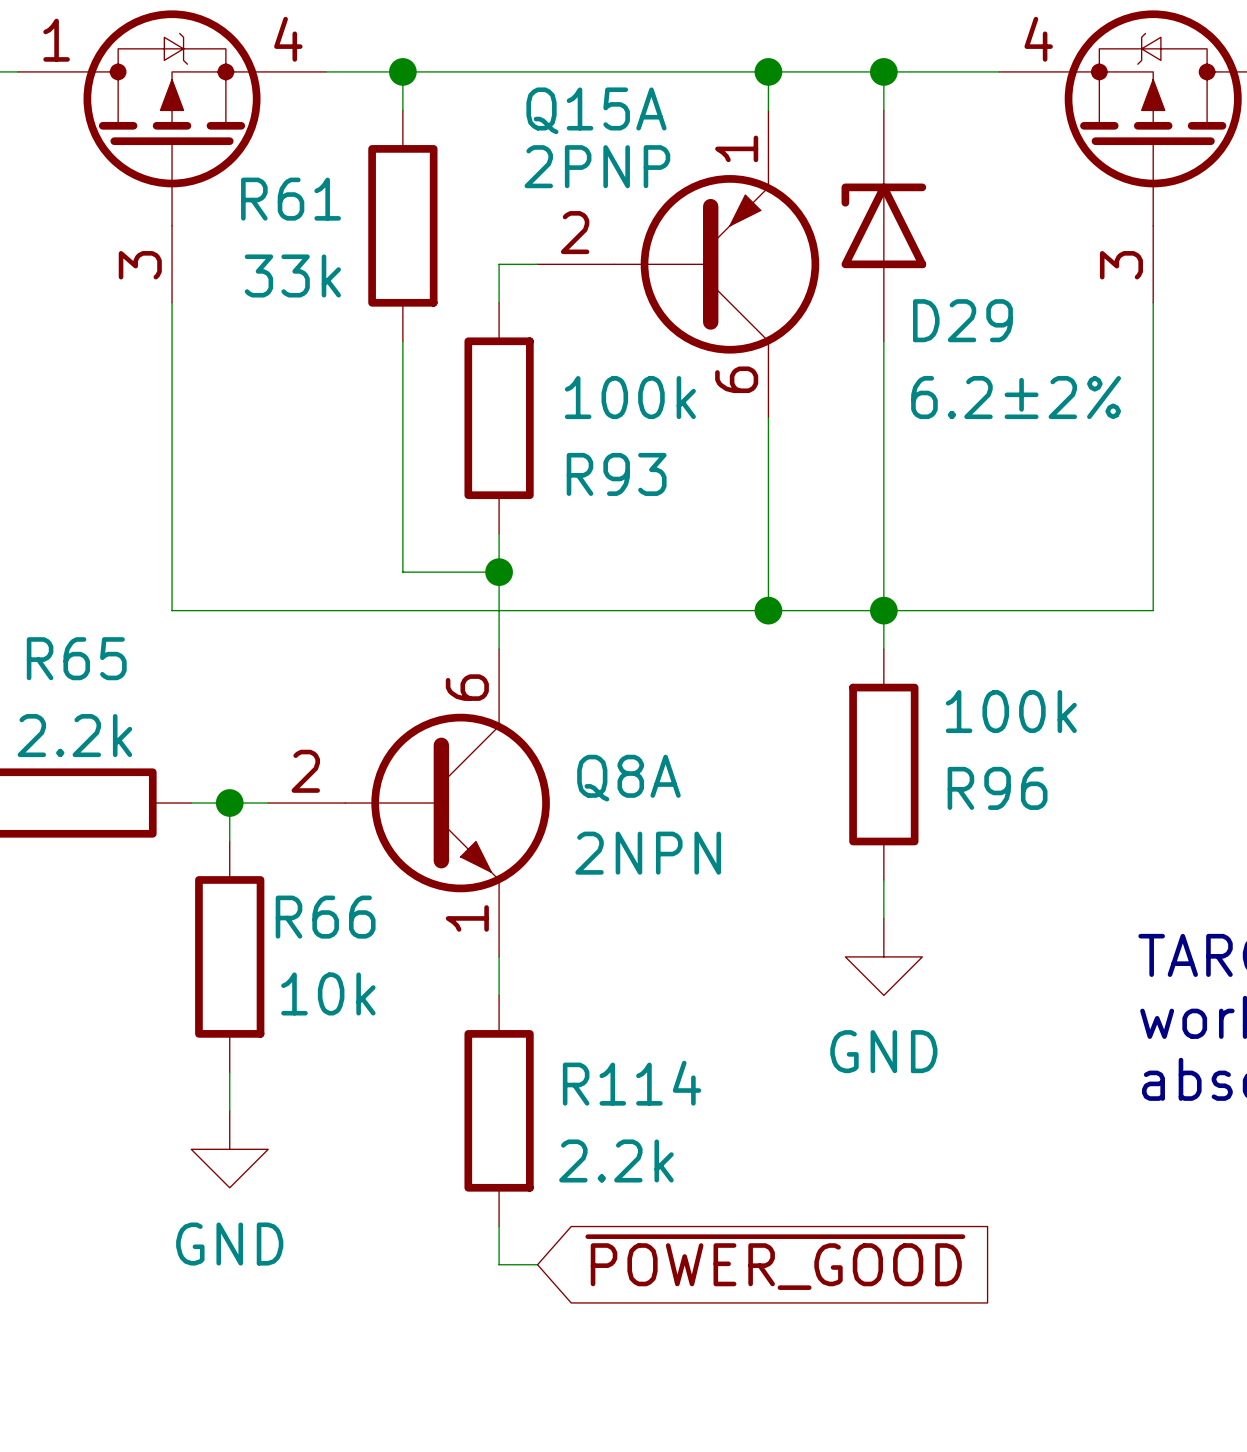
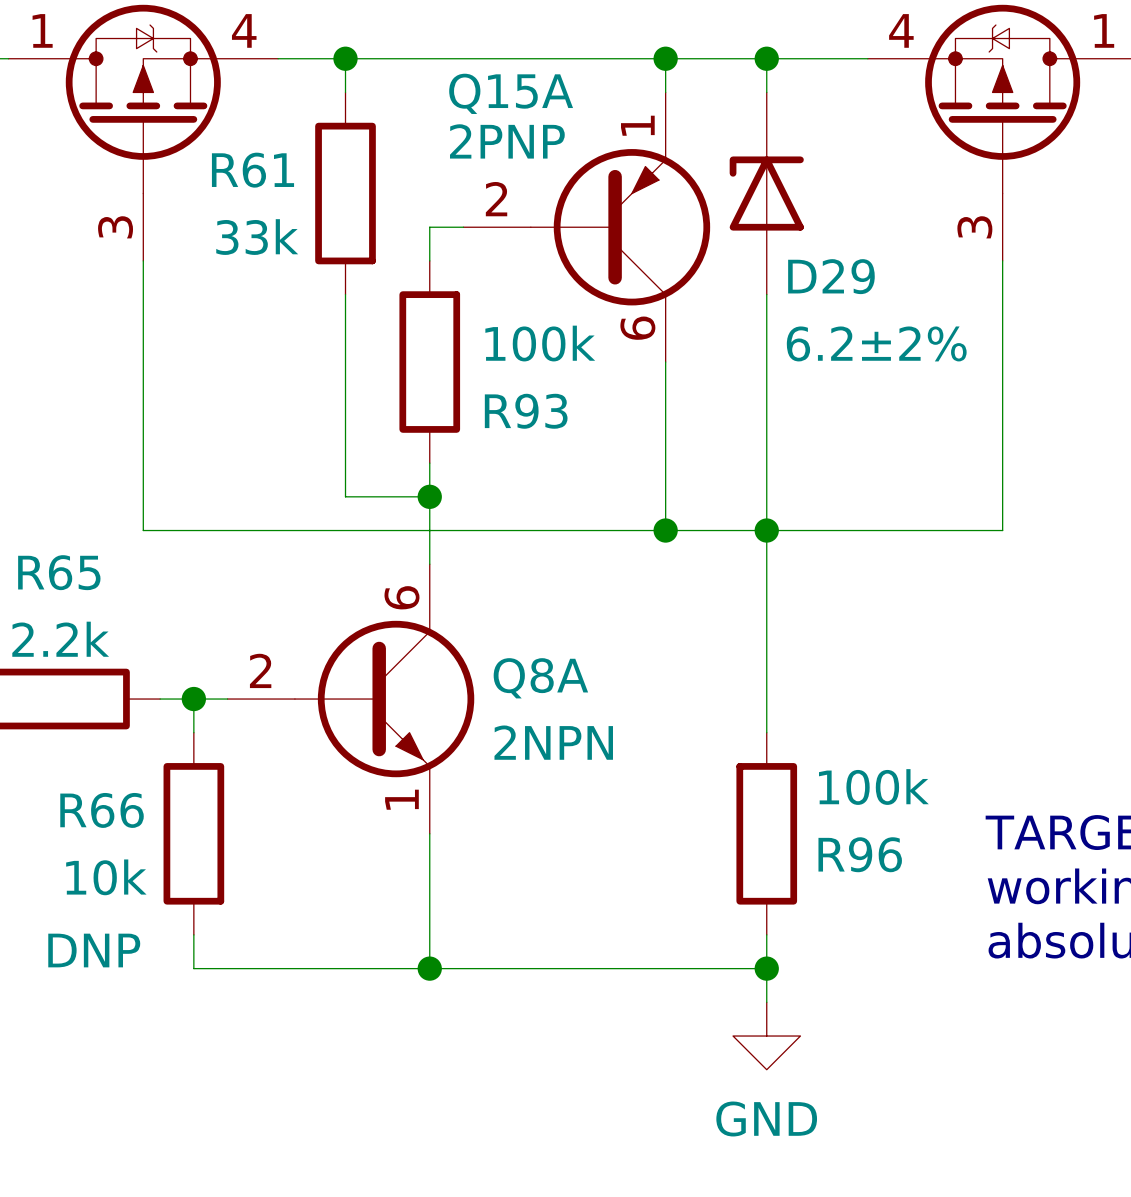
wire: none -> (766, 564) (766, 732)
R96 position: (883, 764) -> (766, 833)
wire: (883, 879) (883, 918) -> none
R66 name position: R66 (325, 917) -> R66 (102, 810)
power symbol position: GND (883, 956) -> GND (766, 1036)
R66 value position: 10k (328, 993) -> 10k (106, 877)
wire: none -> (429, 867) (429, 968)
wire: none -> (766, 934) (766, 1002)
R66 text: none -> DNP (94, 950)
wire: none -> (193, 968) (766, 968)
R114: 2.2k (499, 1110) -> none
junction: none -> (429, 968)
junction: none -> (766, 968)
power symbol: GND (229, 1149) -> none
wire: (499, 1226) (499, 1264) (537, 1264) -> none
global label: ~{POWER_GOOD} (775, 1262) -> none

